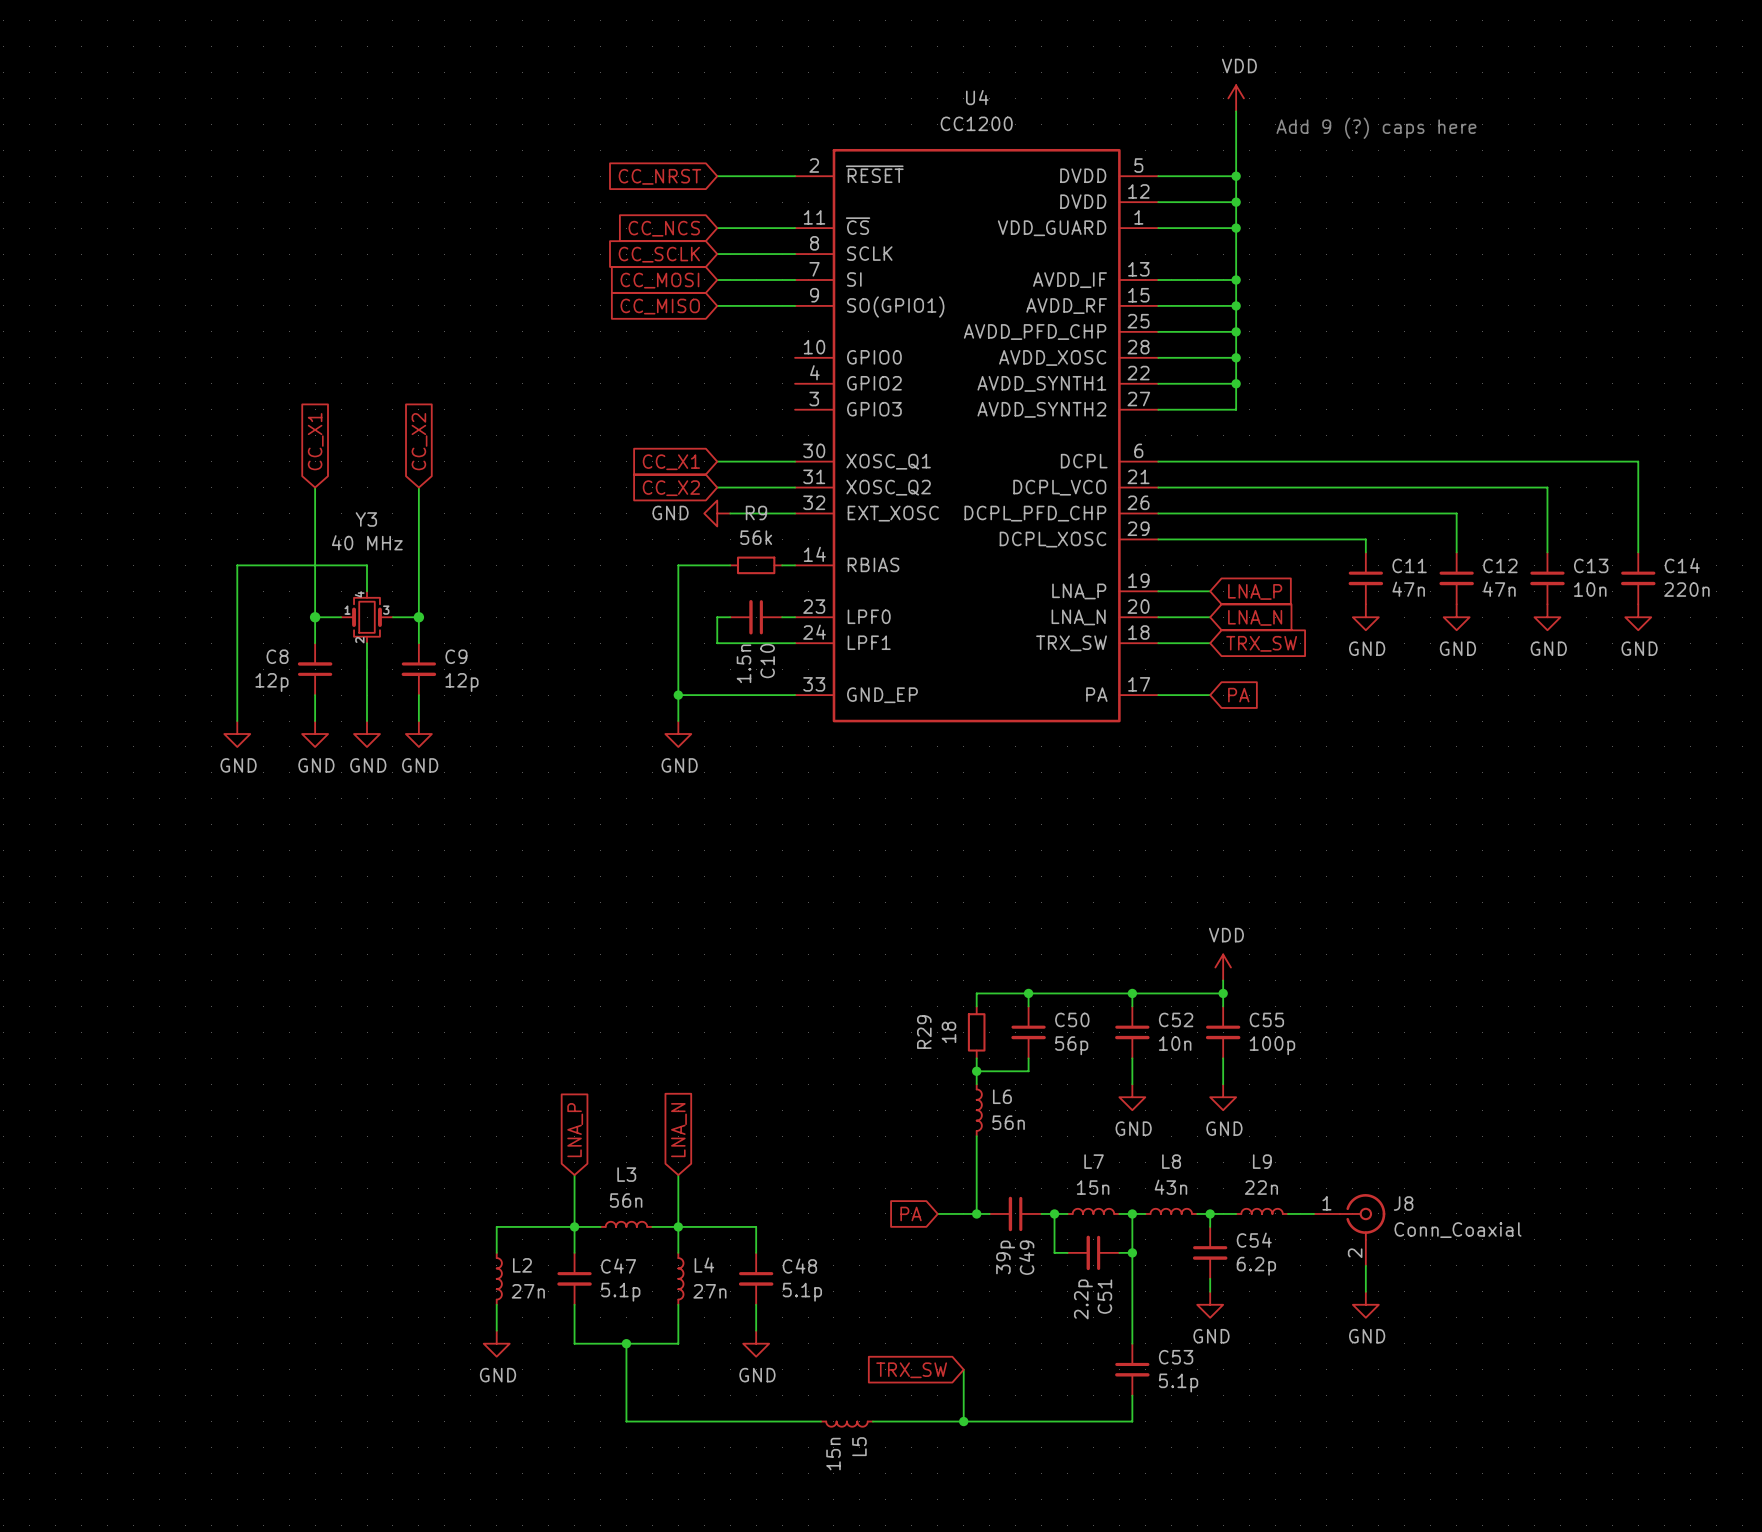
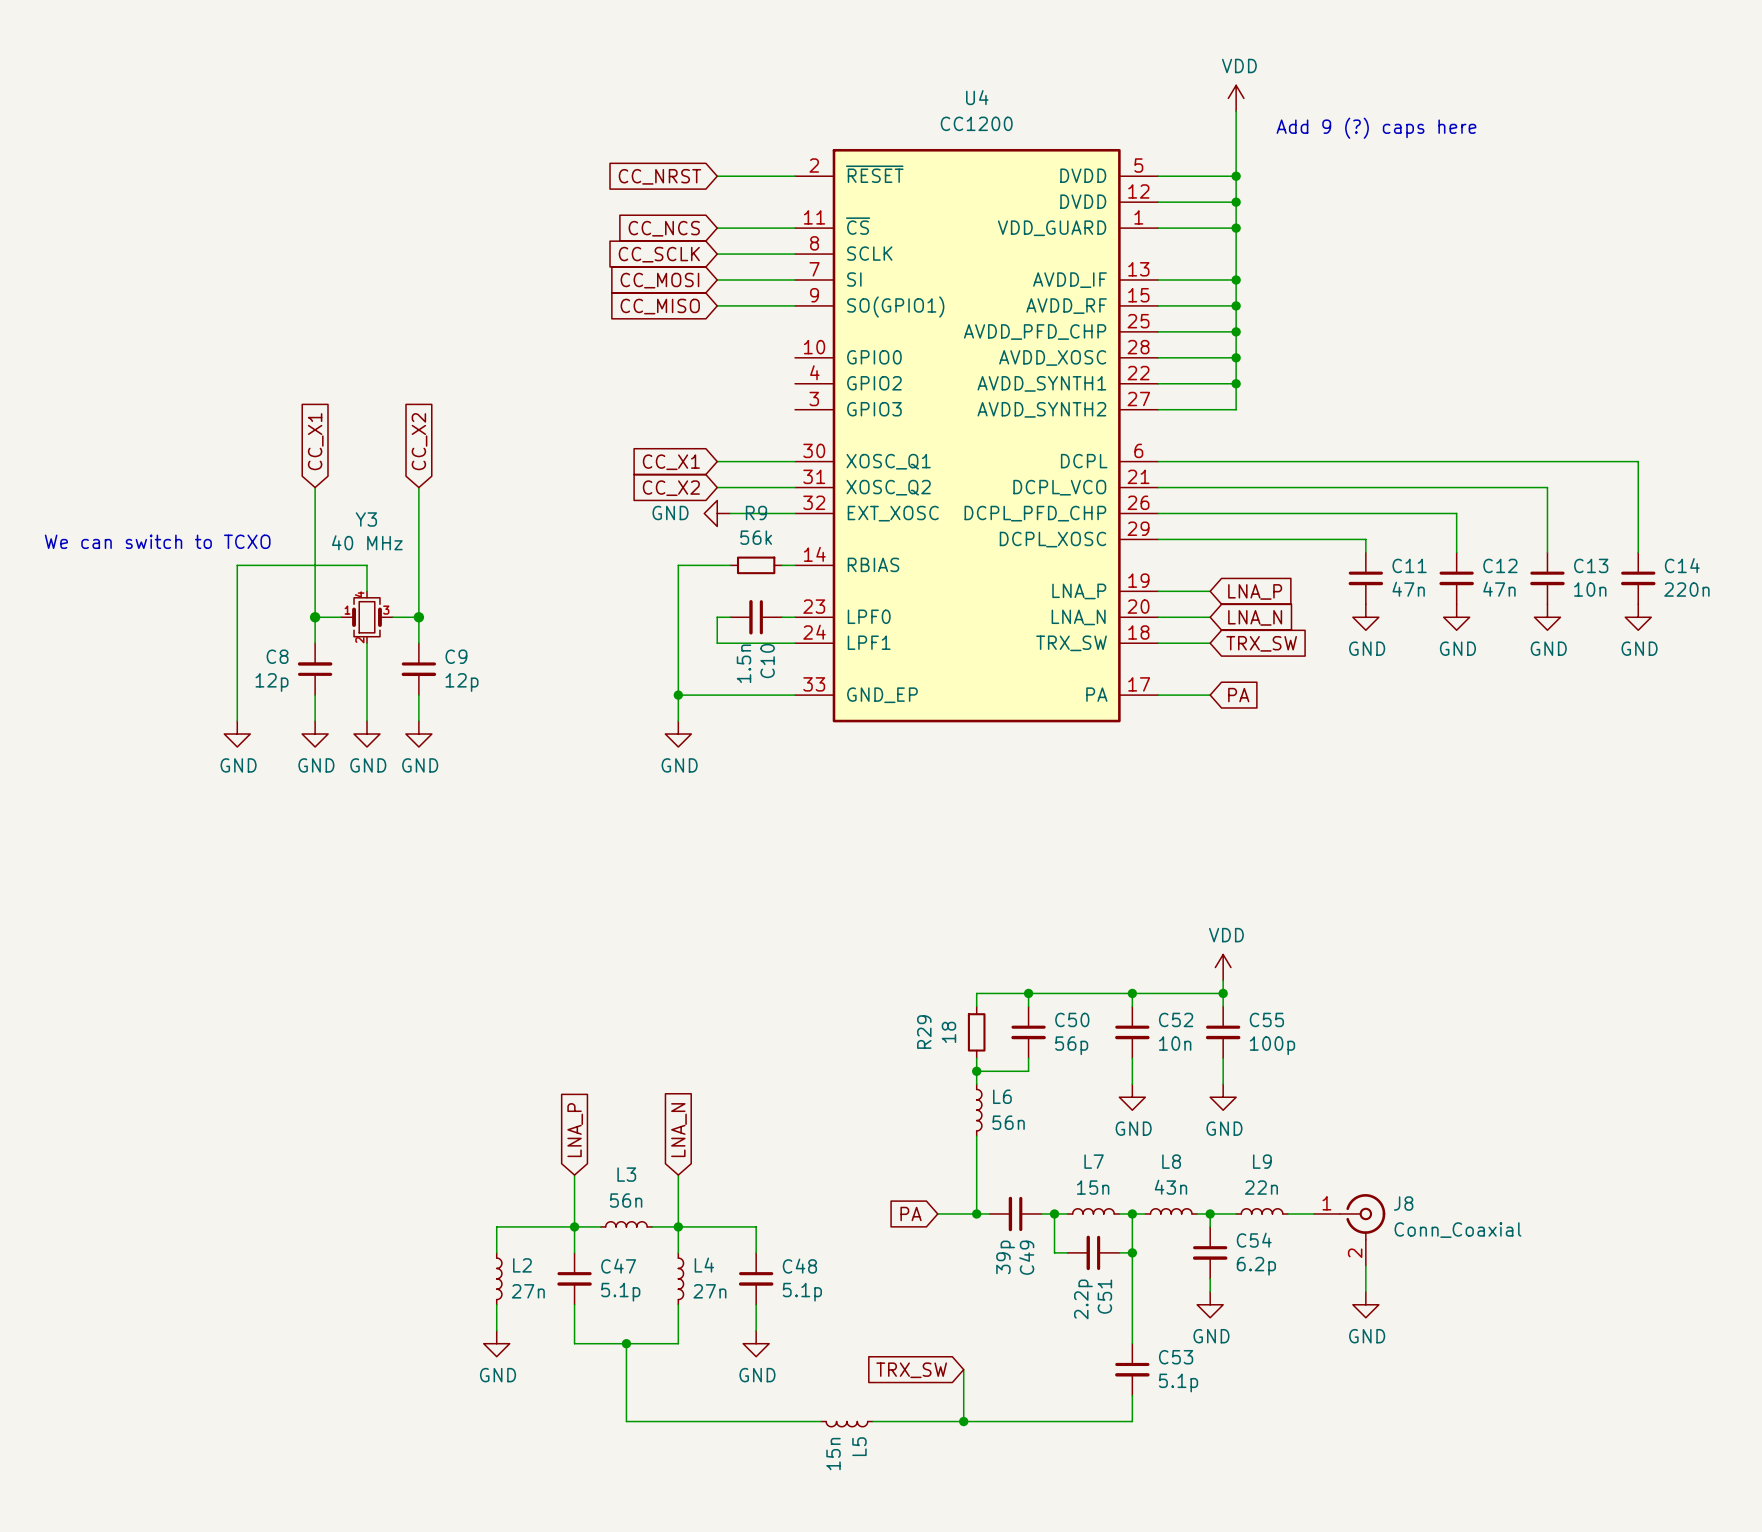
text: none -> We can switch to TCXO (157, 541)

